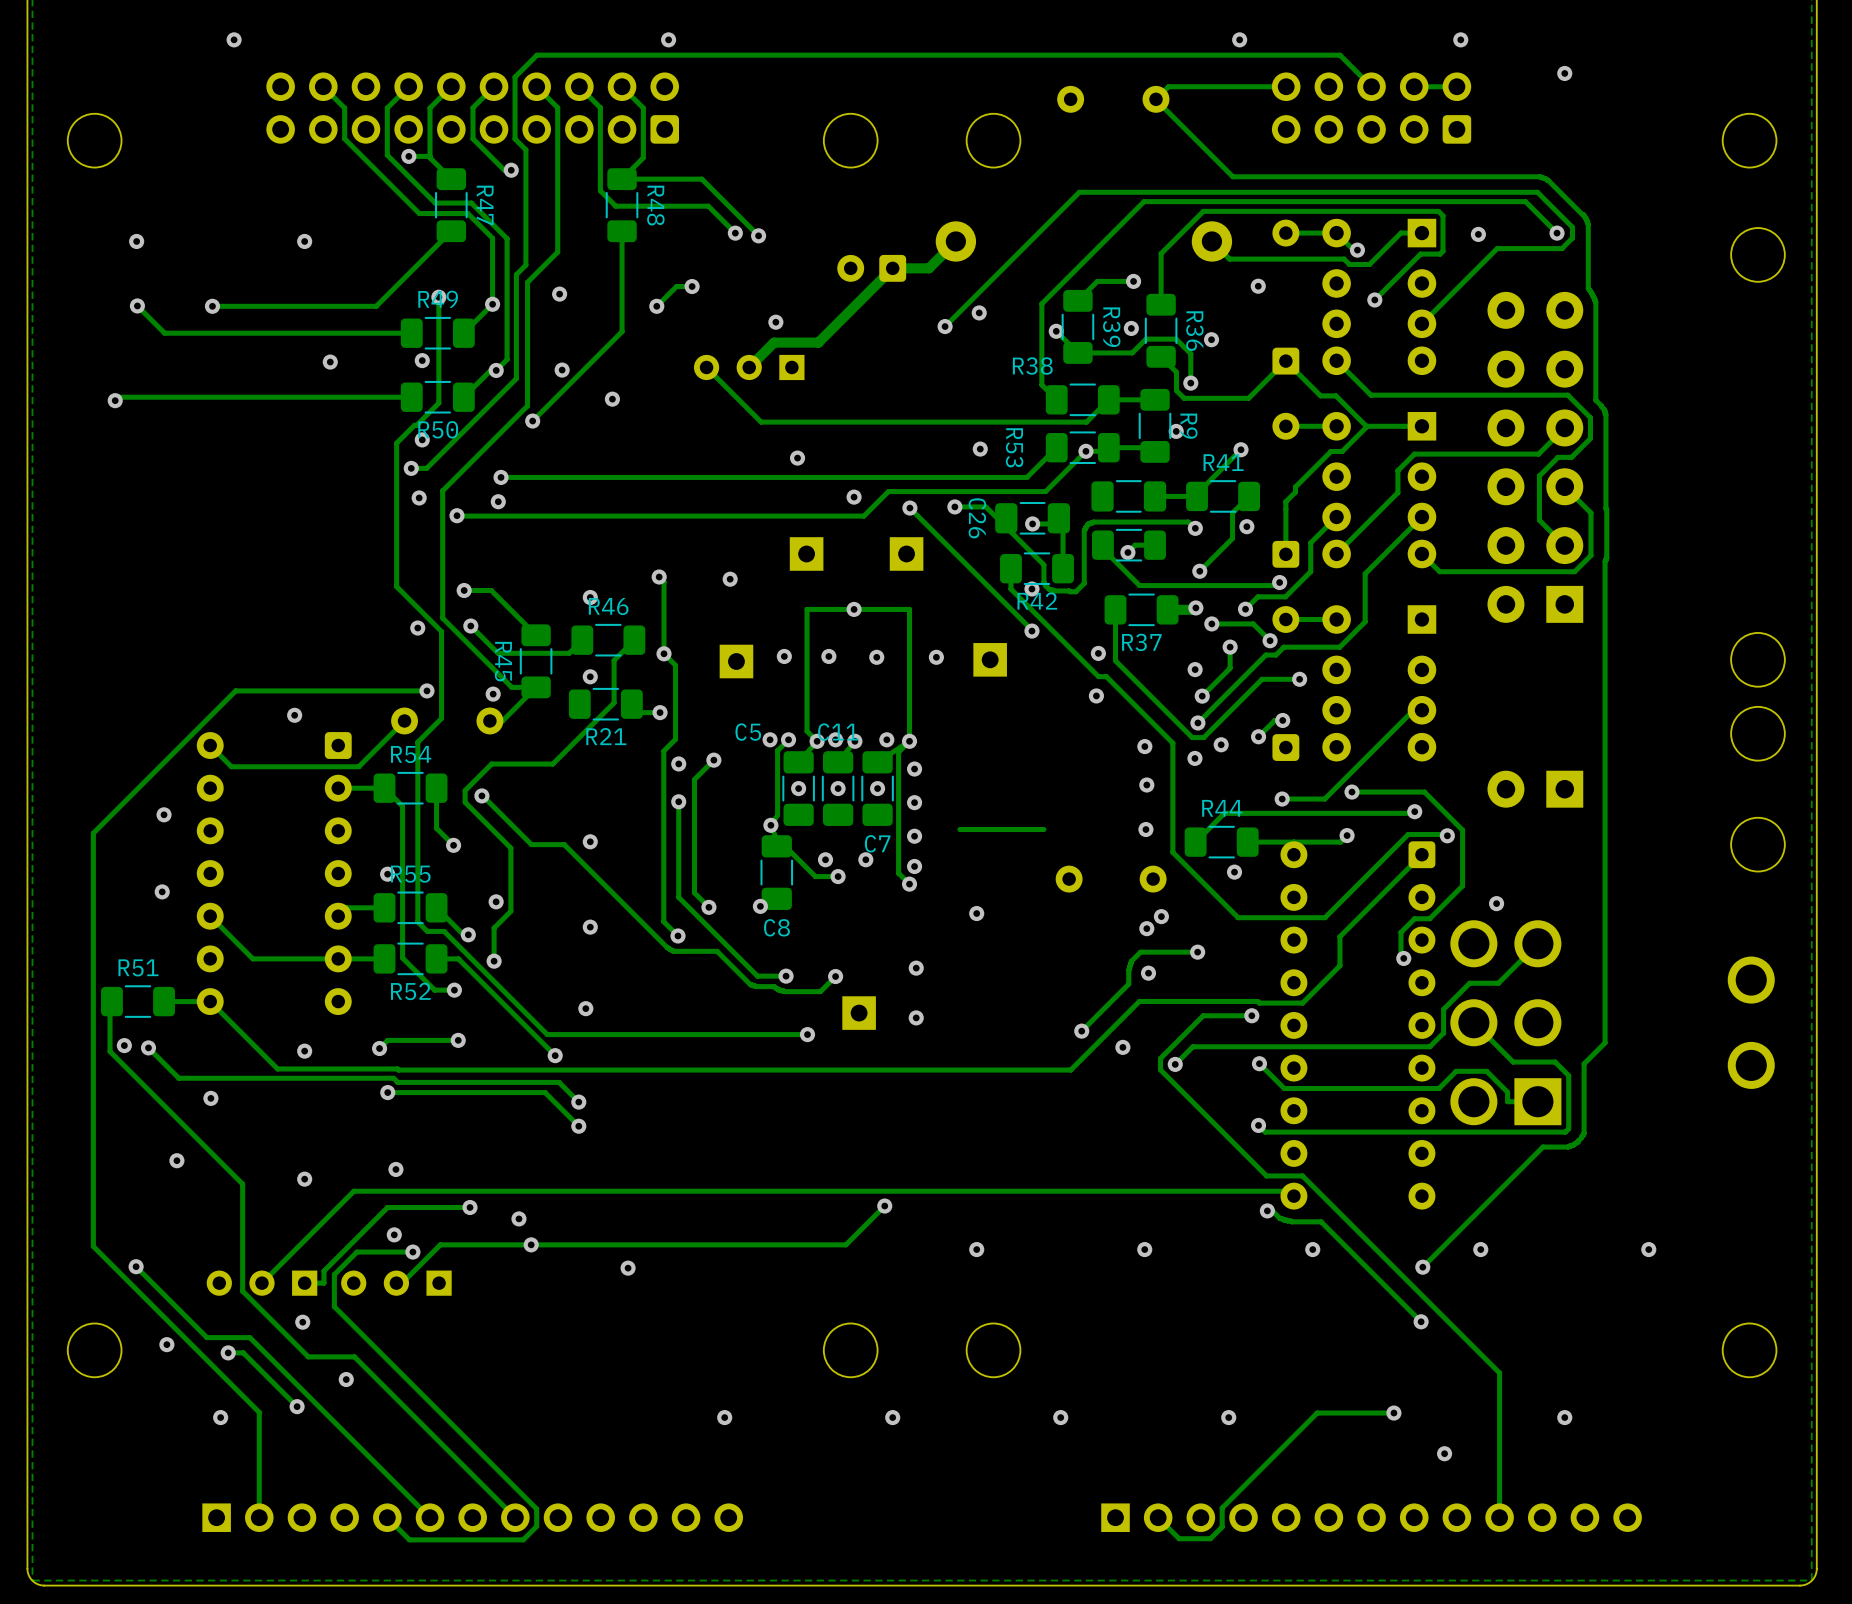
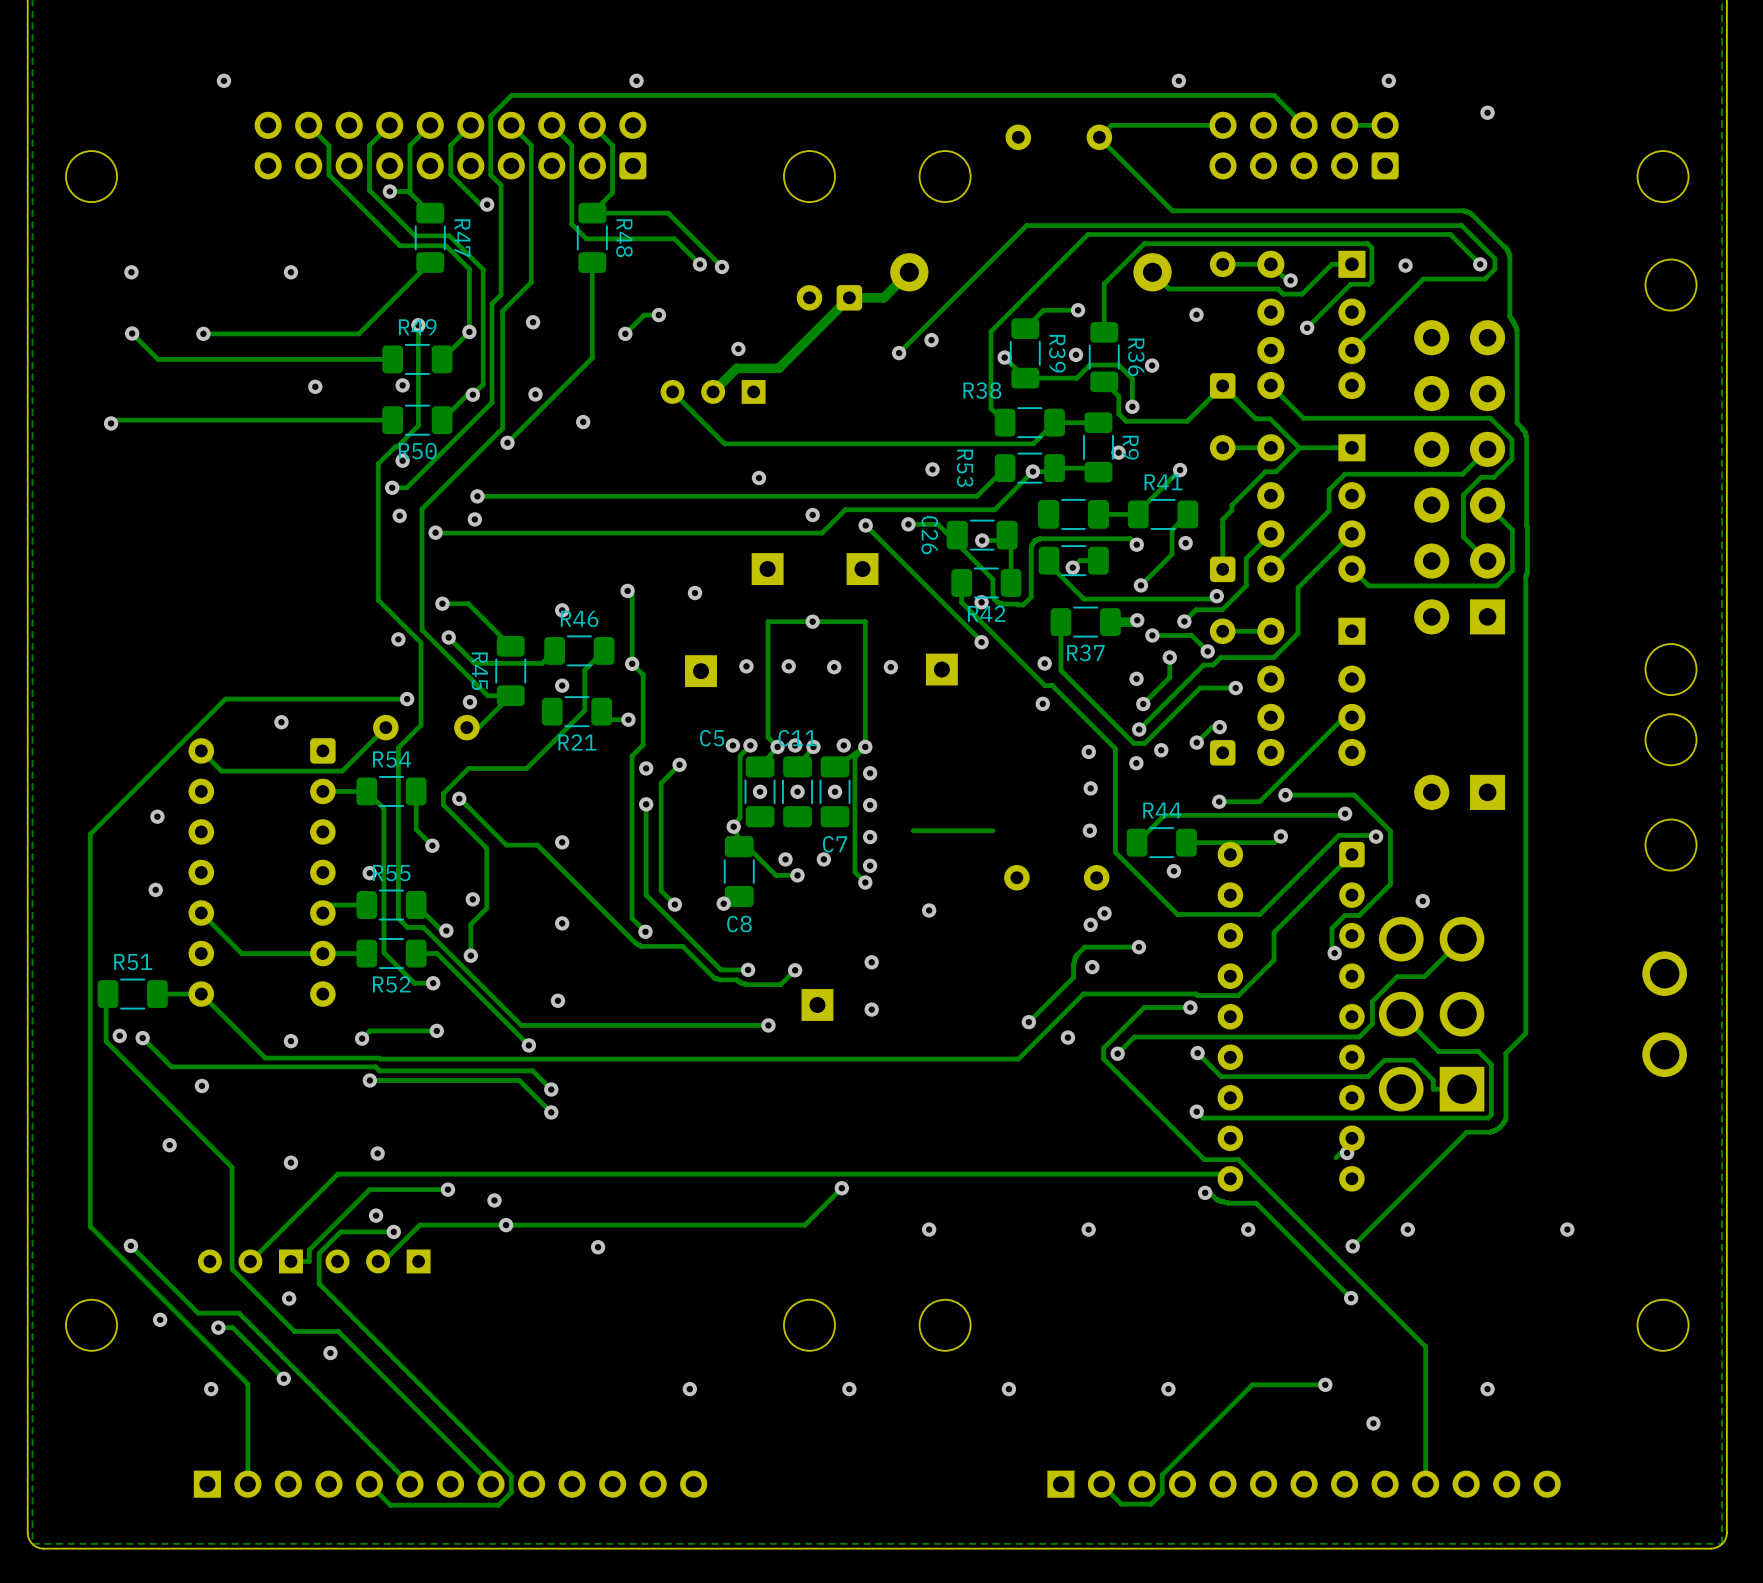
track: none -> (1347, 1152) (1340, 1152) (1335, 1157)
via: none -> (1347, 1152)

